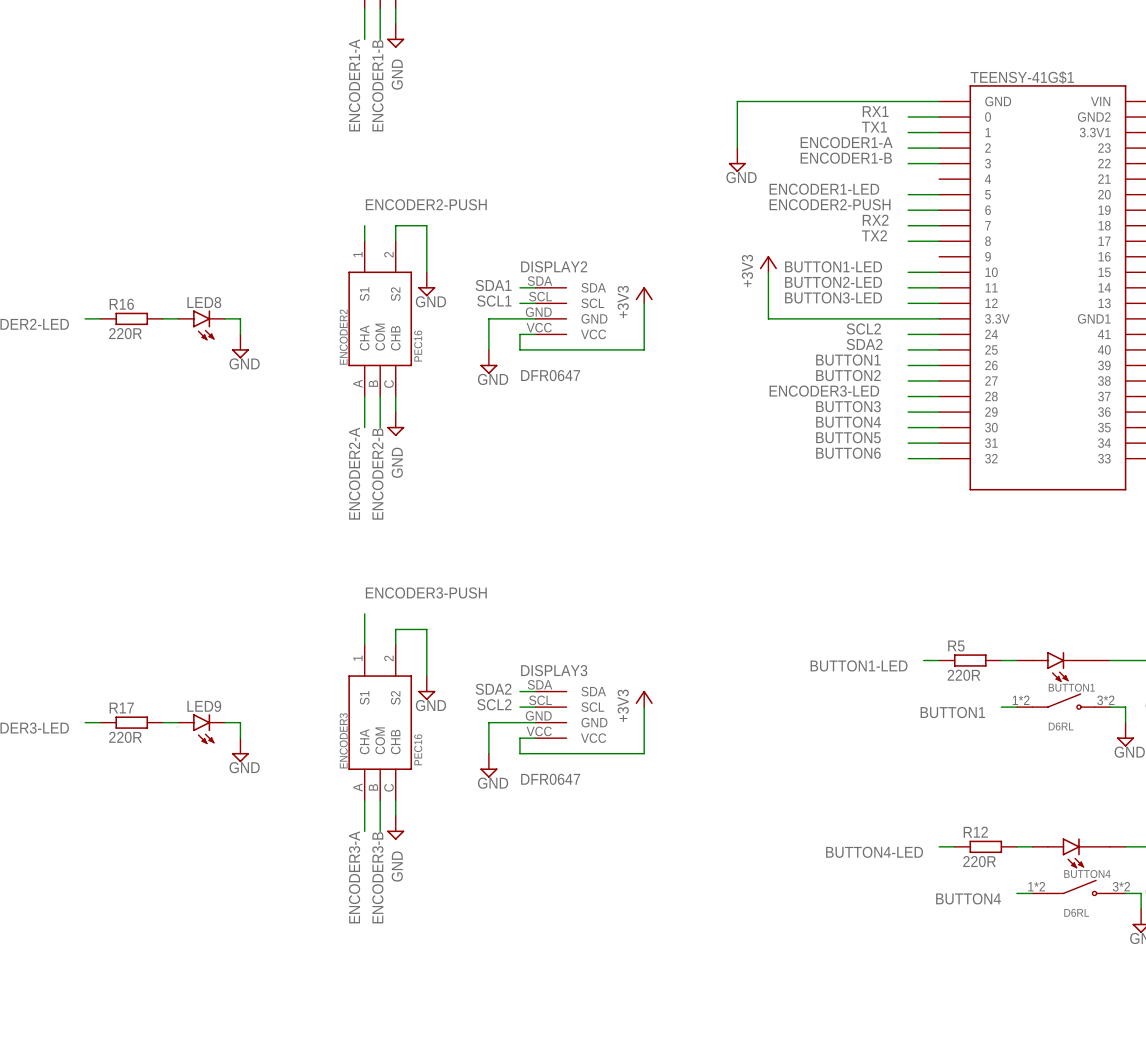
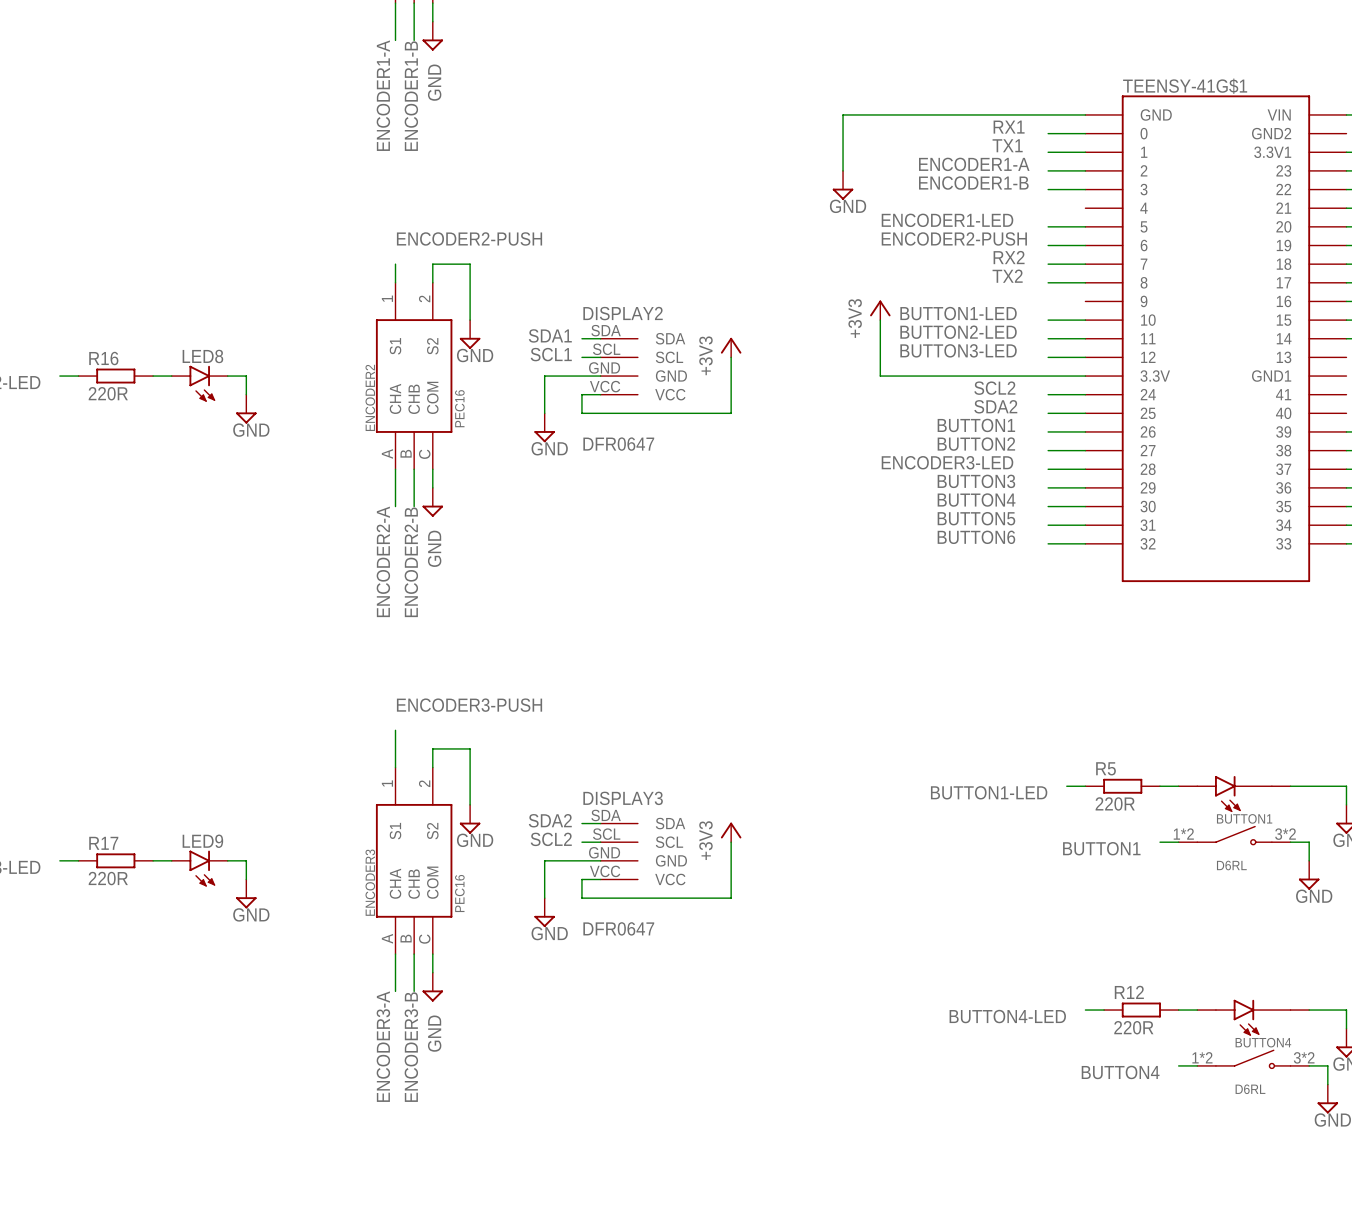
ENCODER2 pin name: COM (380, 337) -> CHB (414, 399)
ENCODER2 pin name: CHB (395, 338) -> COM (432, 397)
ENCODER3 pin name: COM (380, 740) -> CHB (414, 884)
ENCODER3 pin name: CHB (395, 741) -> COM (432, 882)

